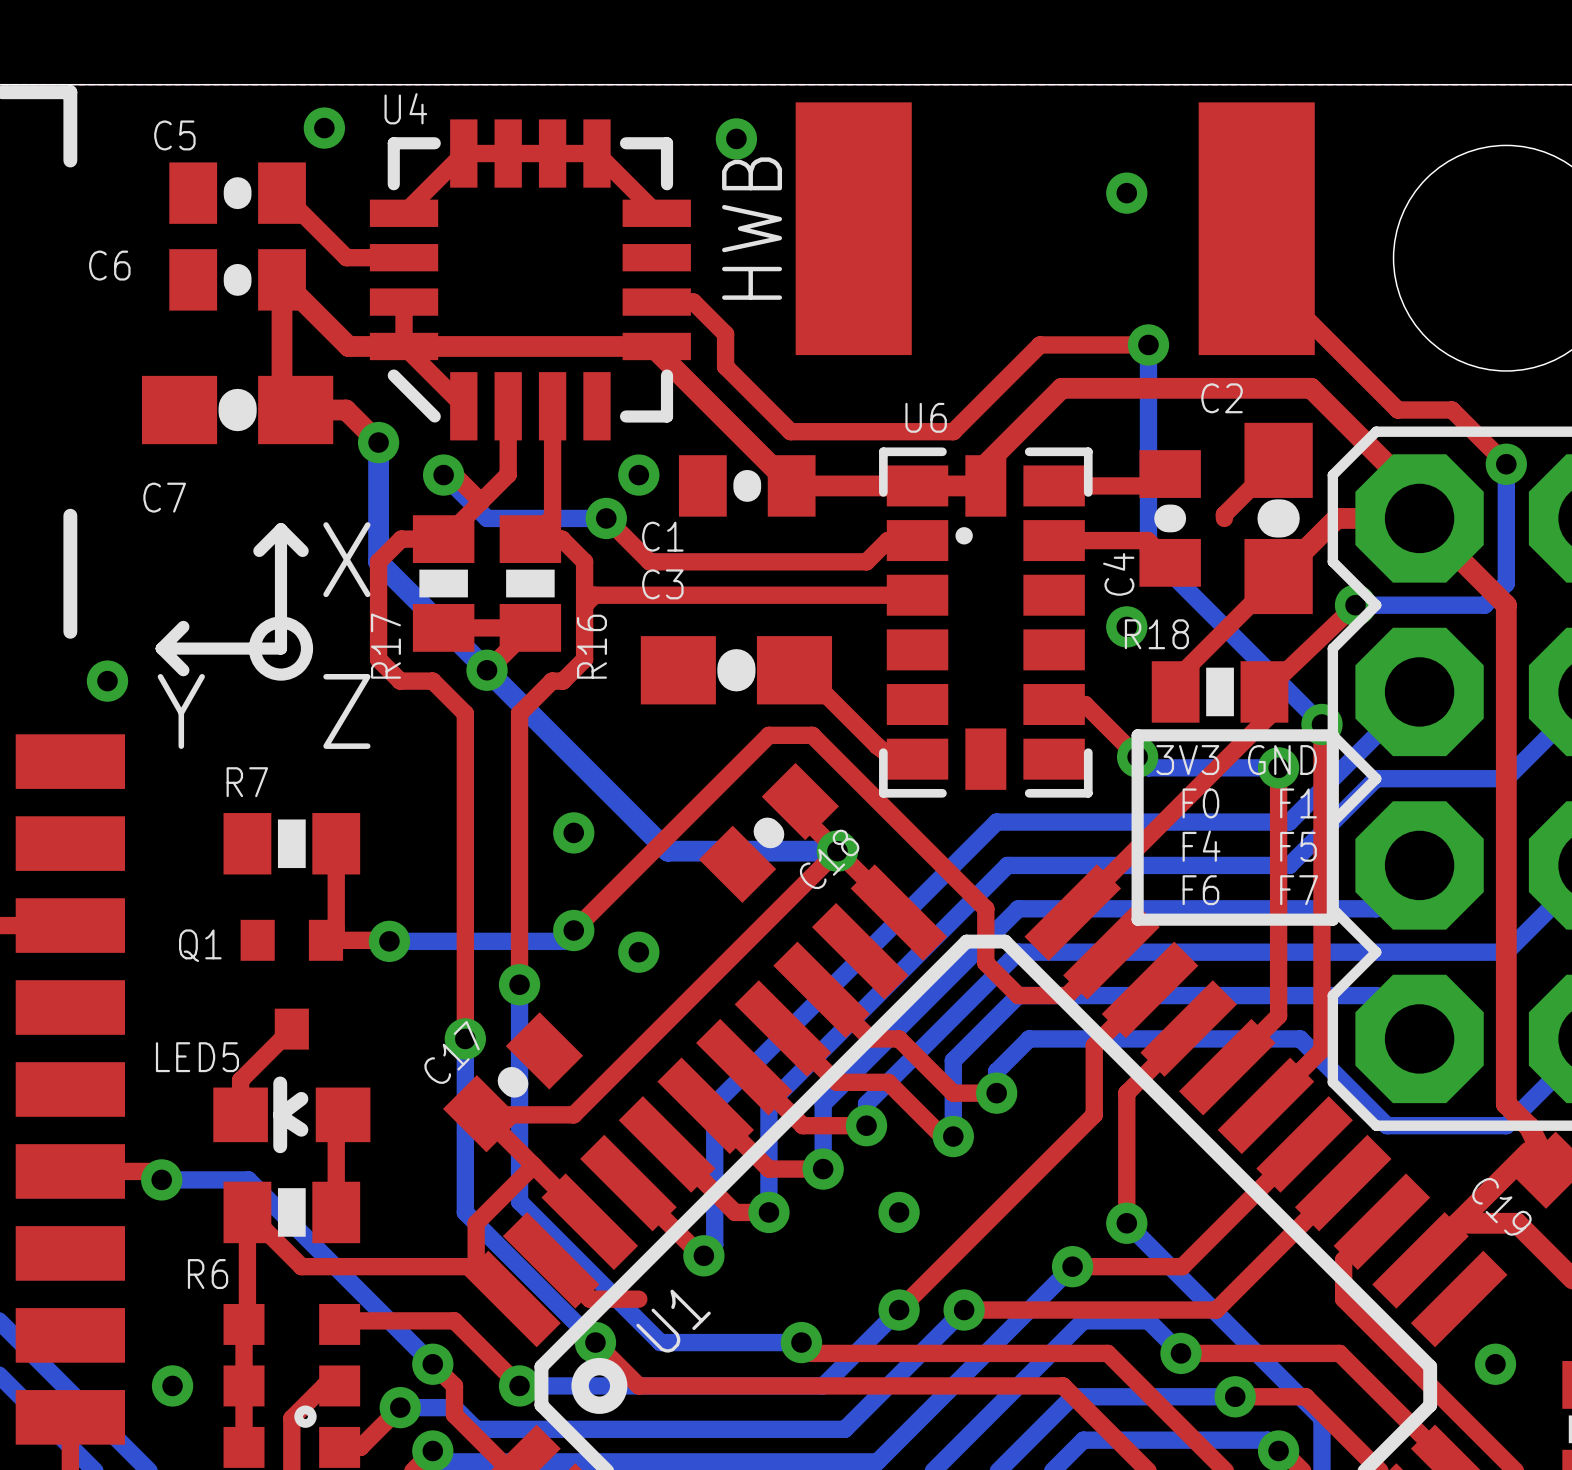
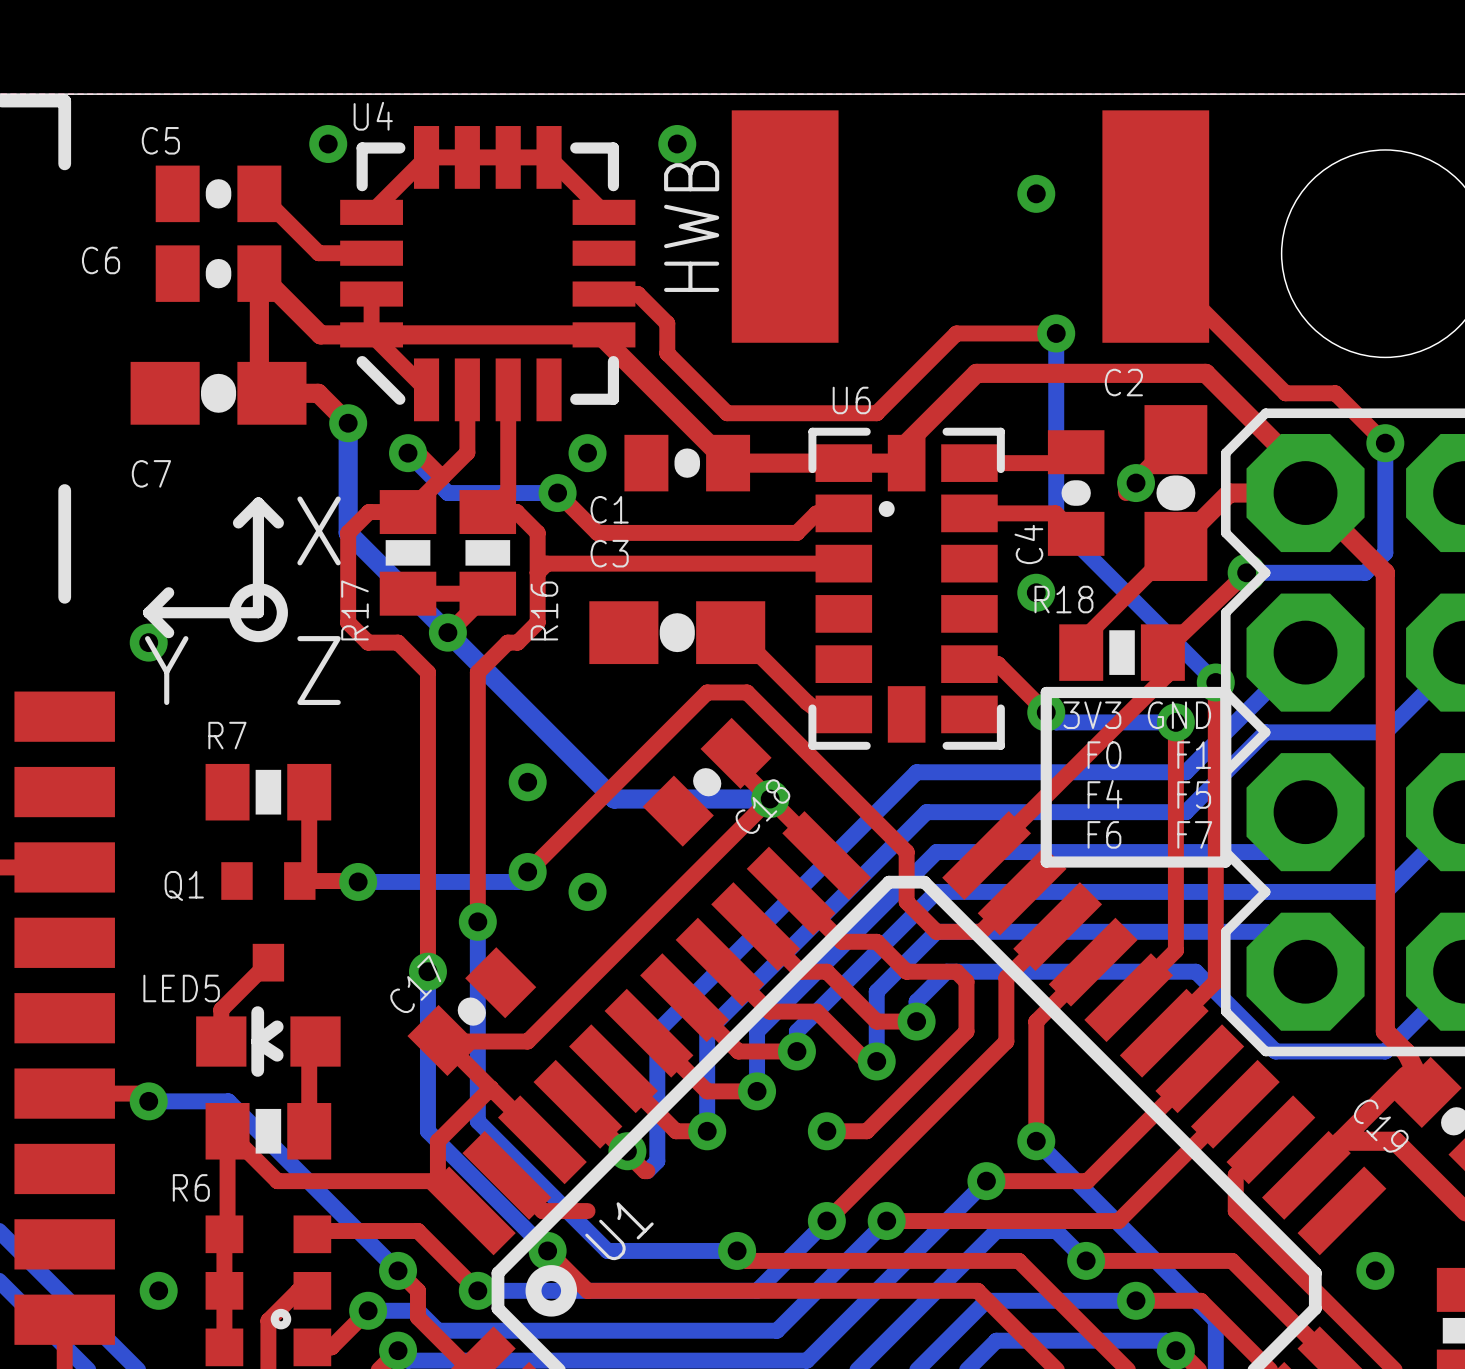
via position: (324, 128) -> (328, 143)
via: none -> (1136, 483)
via position: (107, 681) -> (148, 642)
top track: none -> (791, 891) (841, 941) (876, 941) (906, 971) (956, 971) (966, 981) (966, 1031) (866, 1131) (826, 1131)
via position: (703, 1255) -> (627, 1151)

